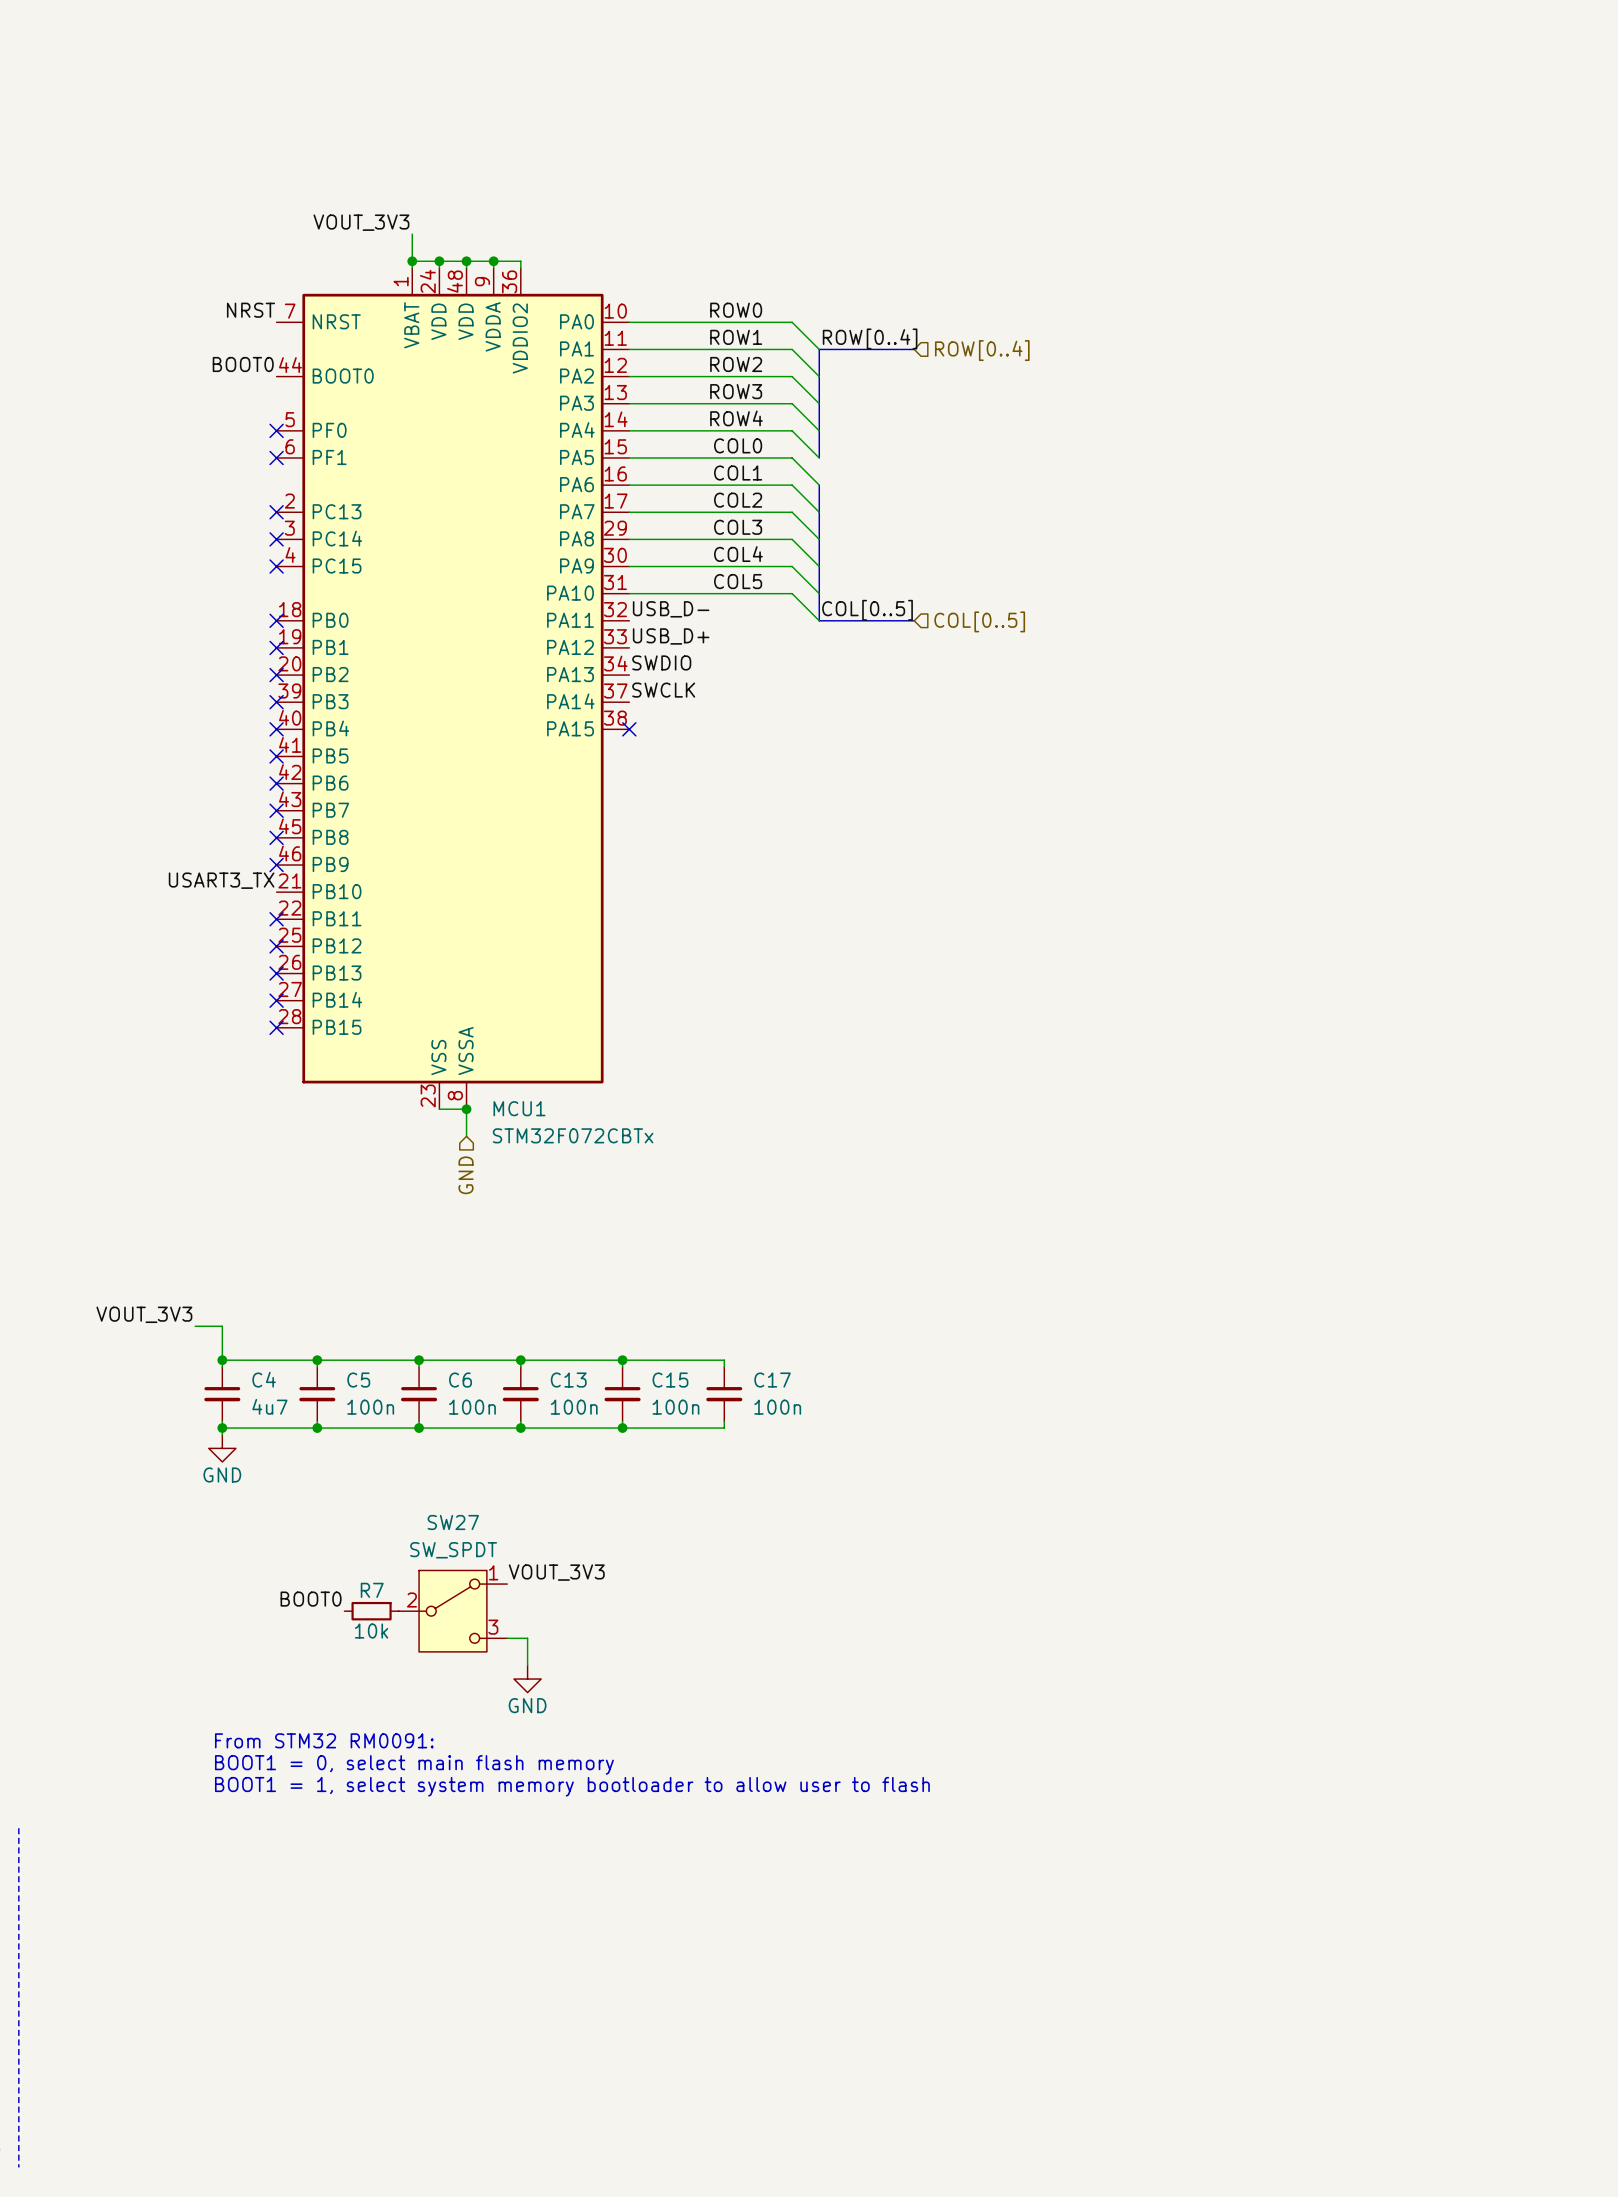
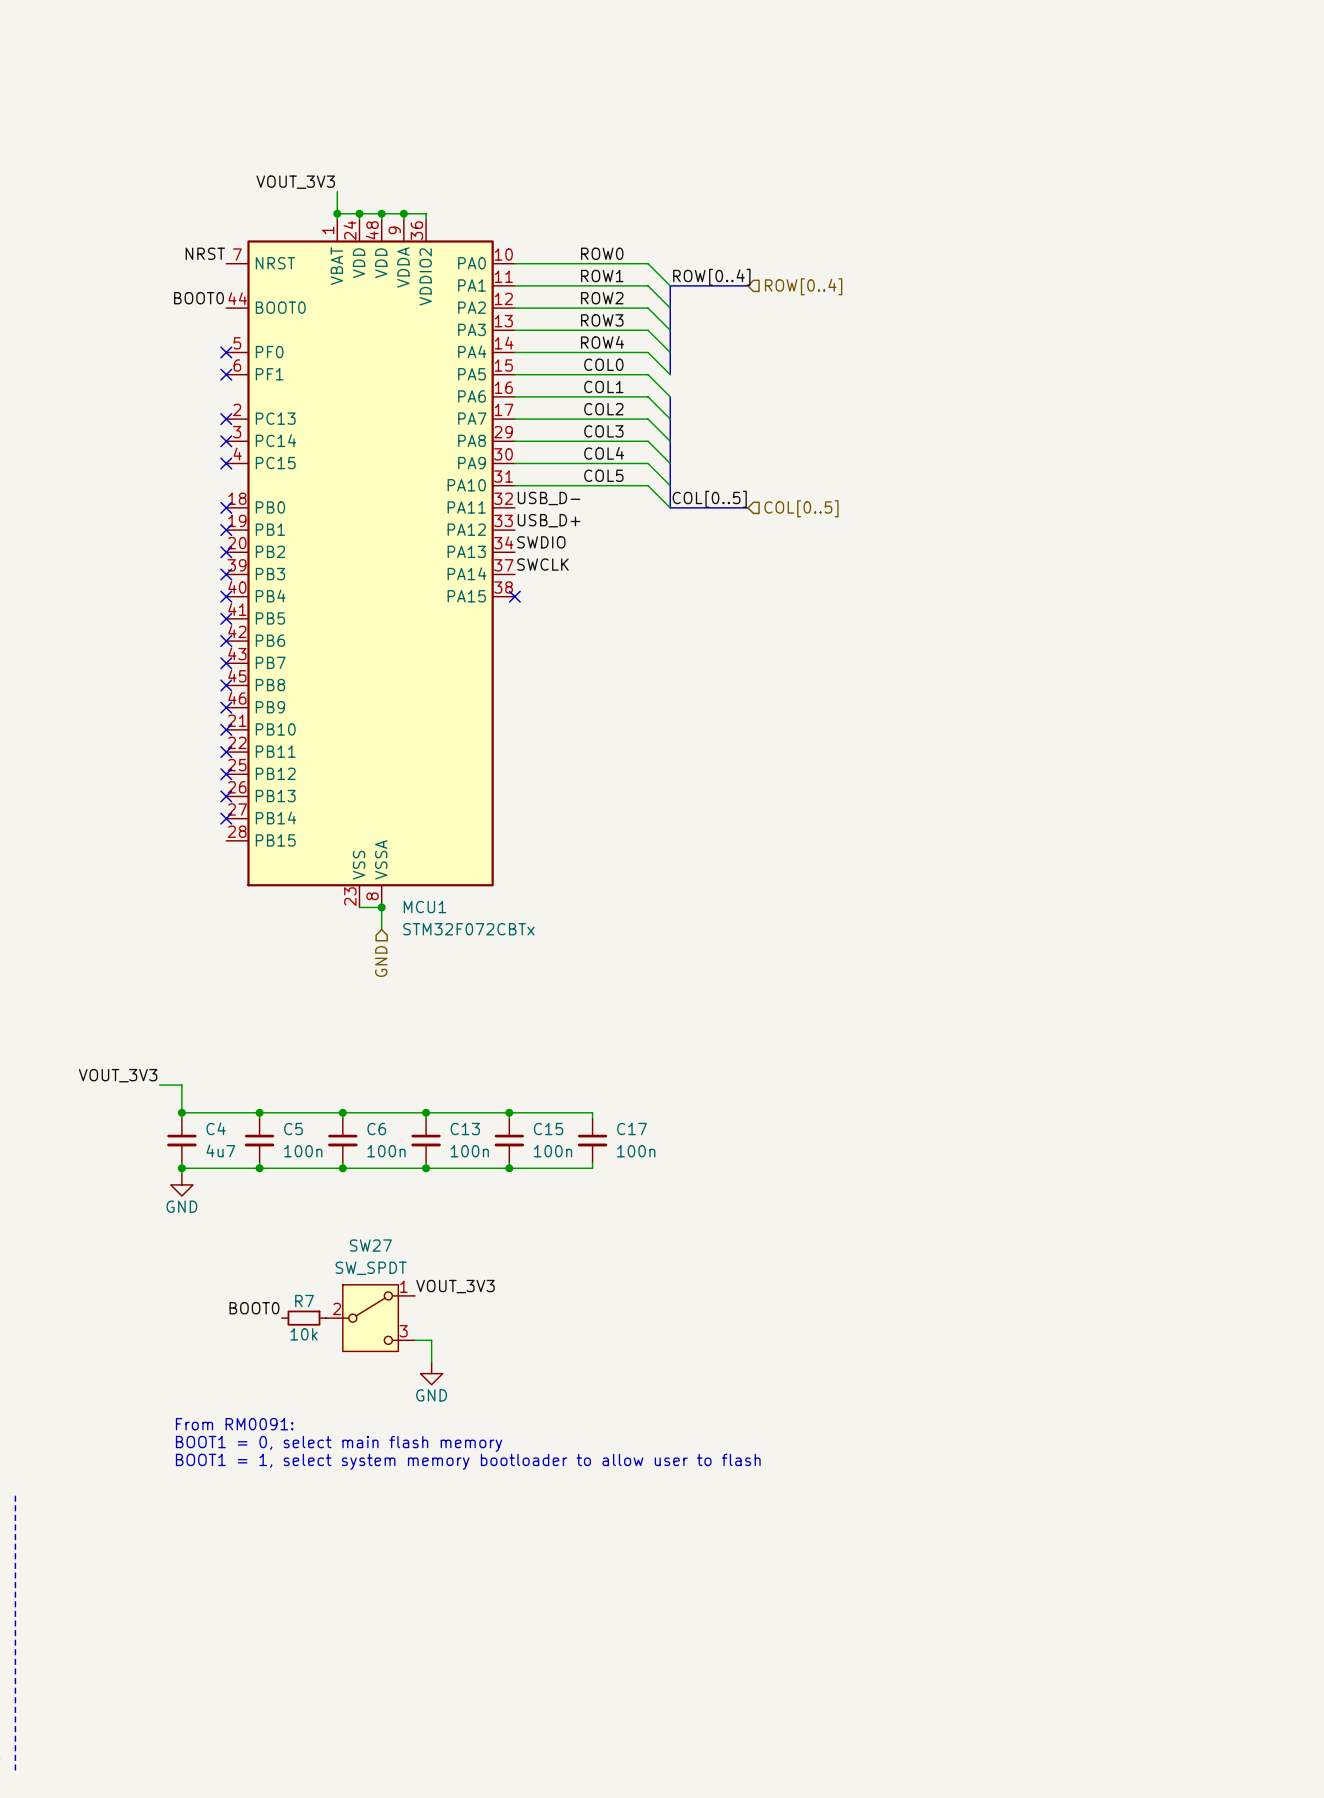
label: USART3_TX (221, 880) -> none
no-connect mark: none -> (226, 729)
no-connect mark: (276, 1027) -> none
text: From STM32 RM0091: (324, 1740) -> From RM0091: (234, 1424)

